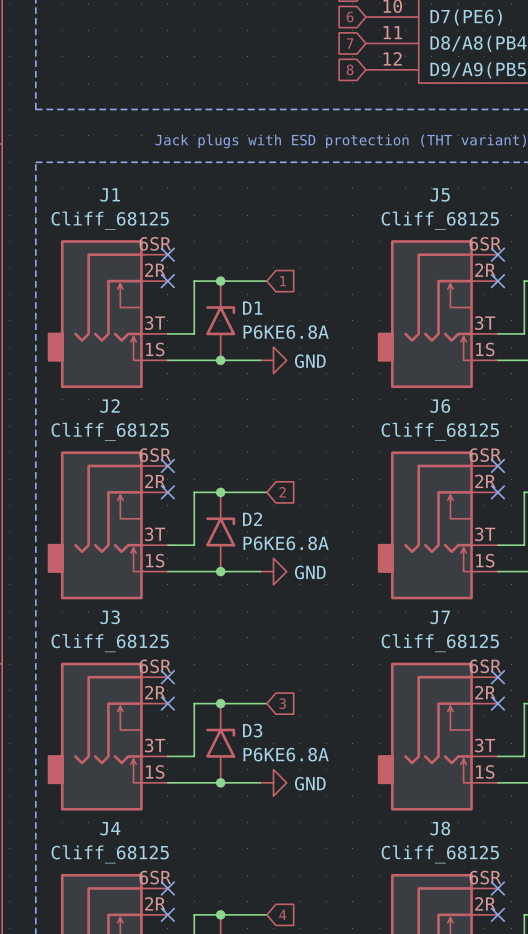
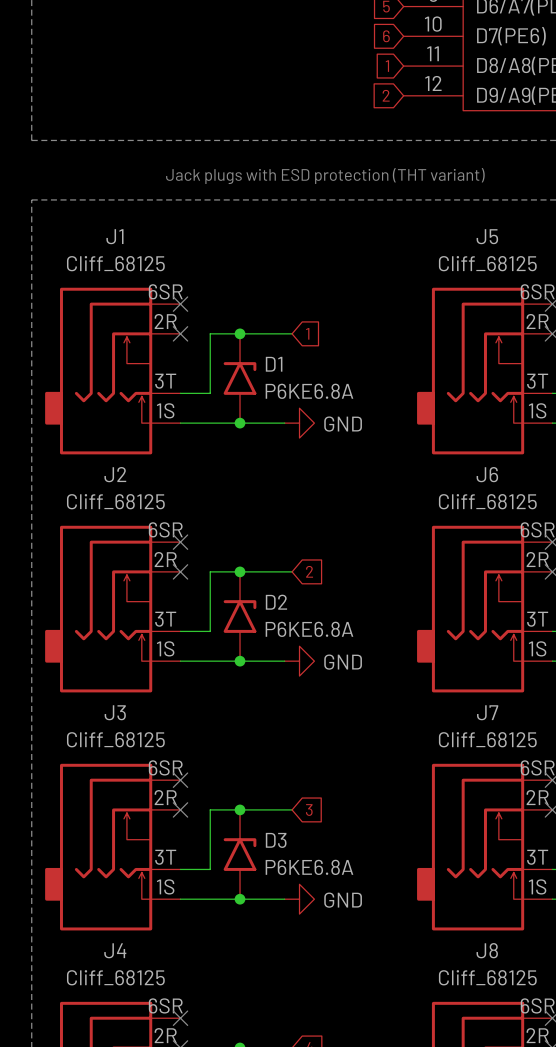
global label: 7 (350, 43) -> 1 (387, 66)
global label: 8 (350, 69) -> 2 (386, 95)

